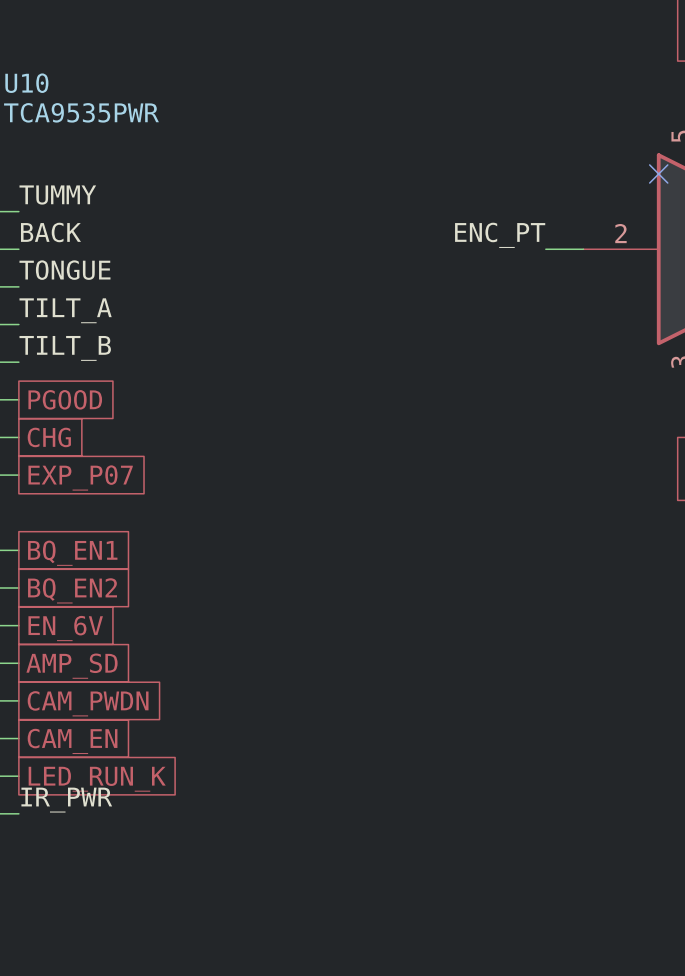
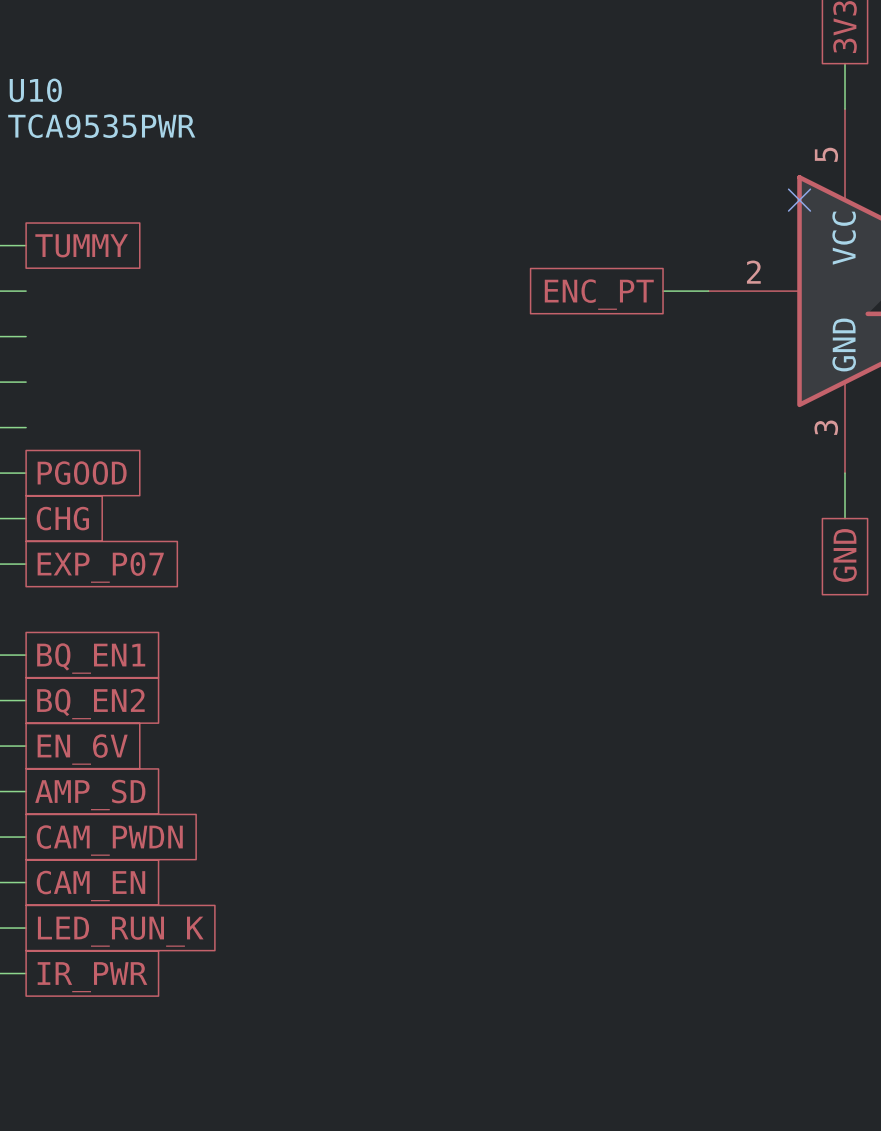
label: TUMMY (57, 195) -> none
global label: none -> TUMMY (81, 245)
label: BACK (50, 232) -> none
label: ENC_PT (500, 235) -> none
global label: none -> ENC_PT (599, 294)
label: TONGUE (64, 270) -> none
label: TILT_A (65, 310) -> none
label: TILT_B (65, 348) -> none
label: IR_PWR (66, 800) -> none
global label: none -> IR_PWR (92, 977)

